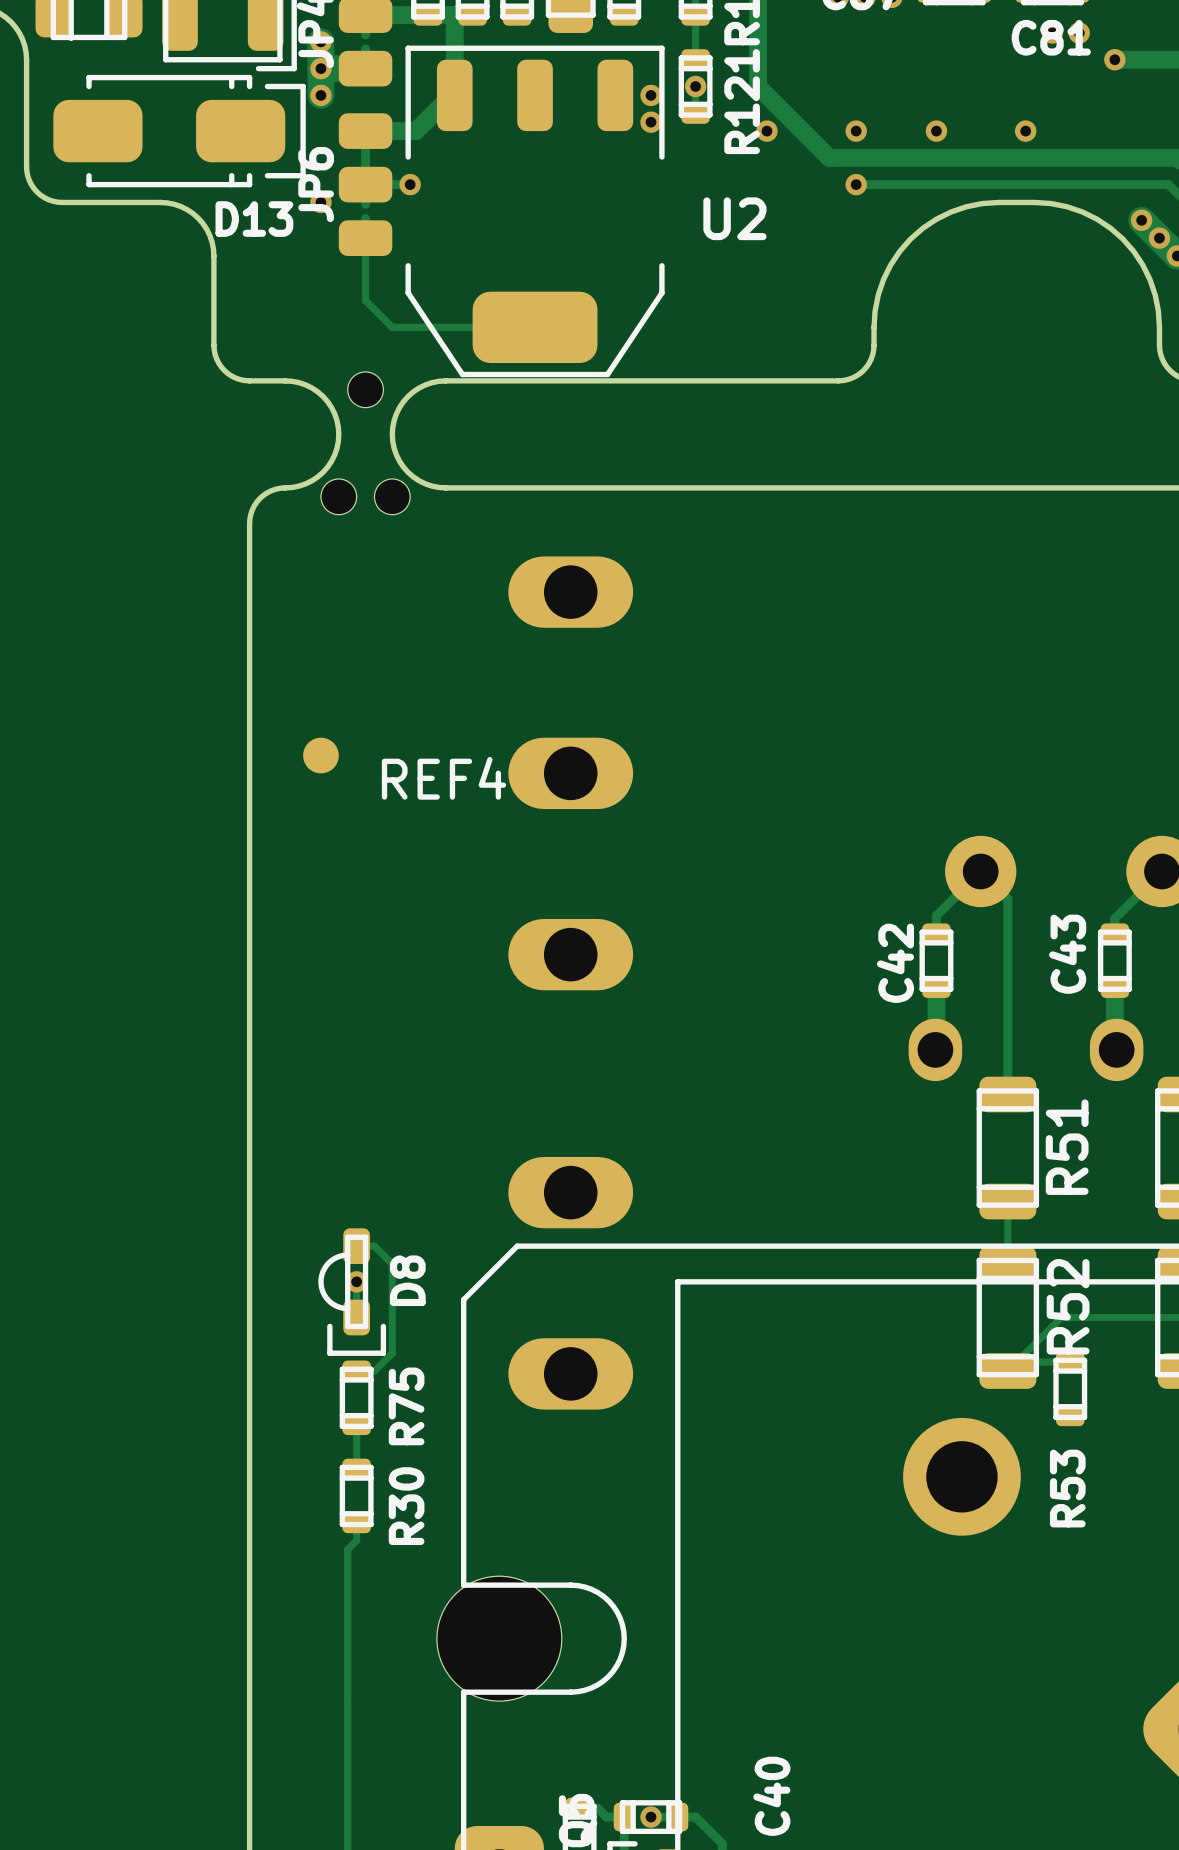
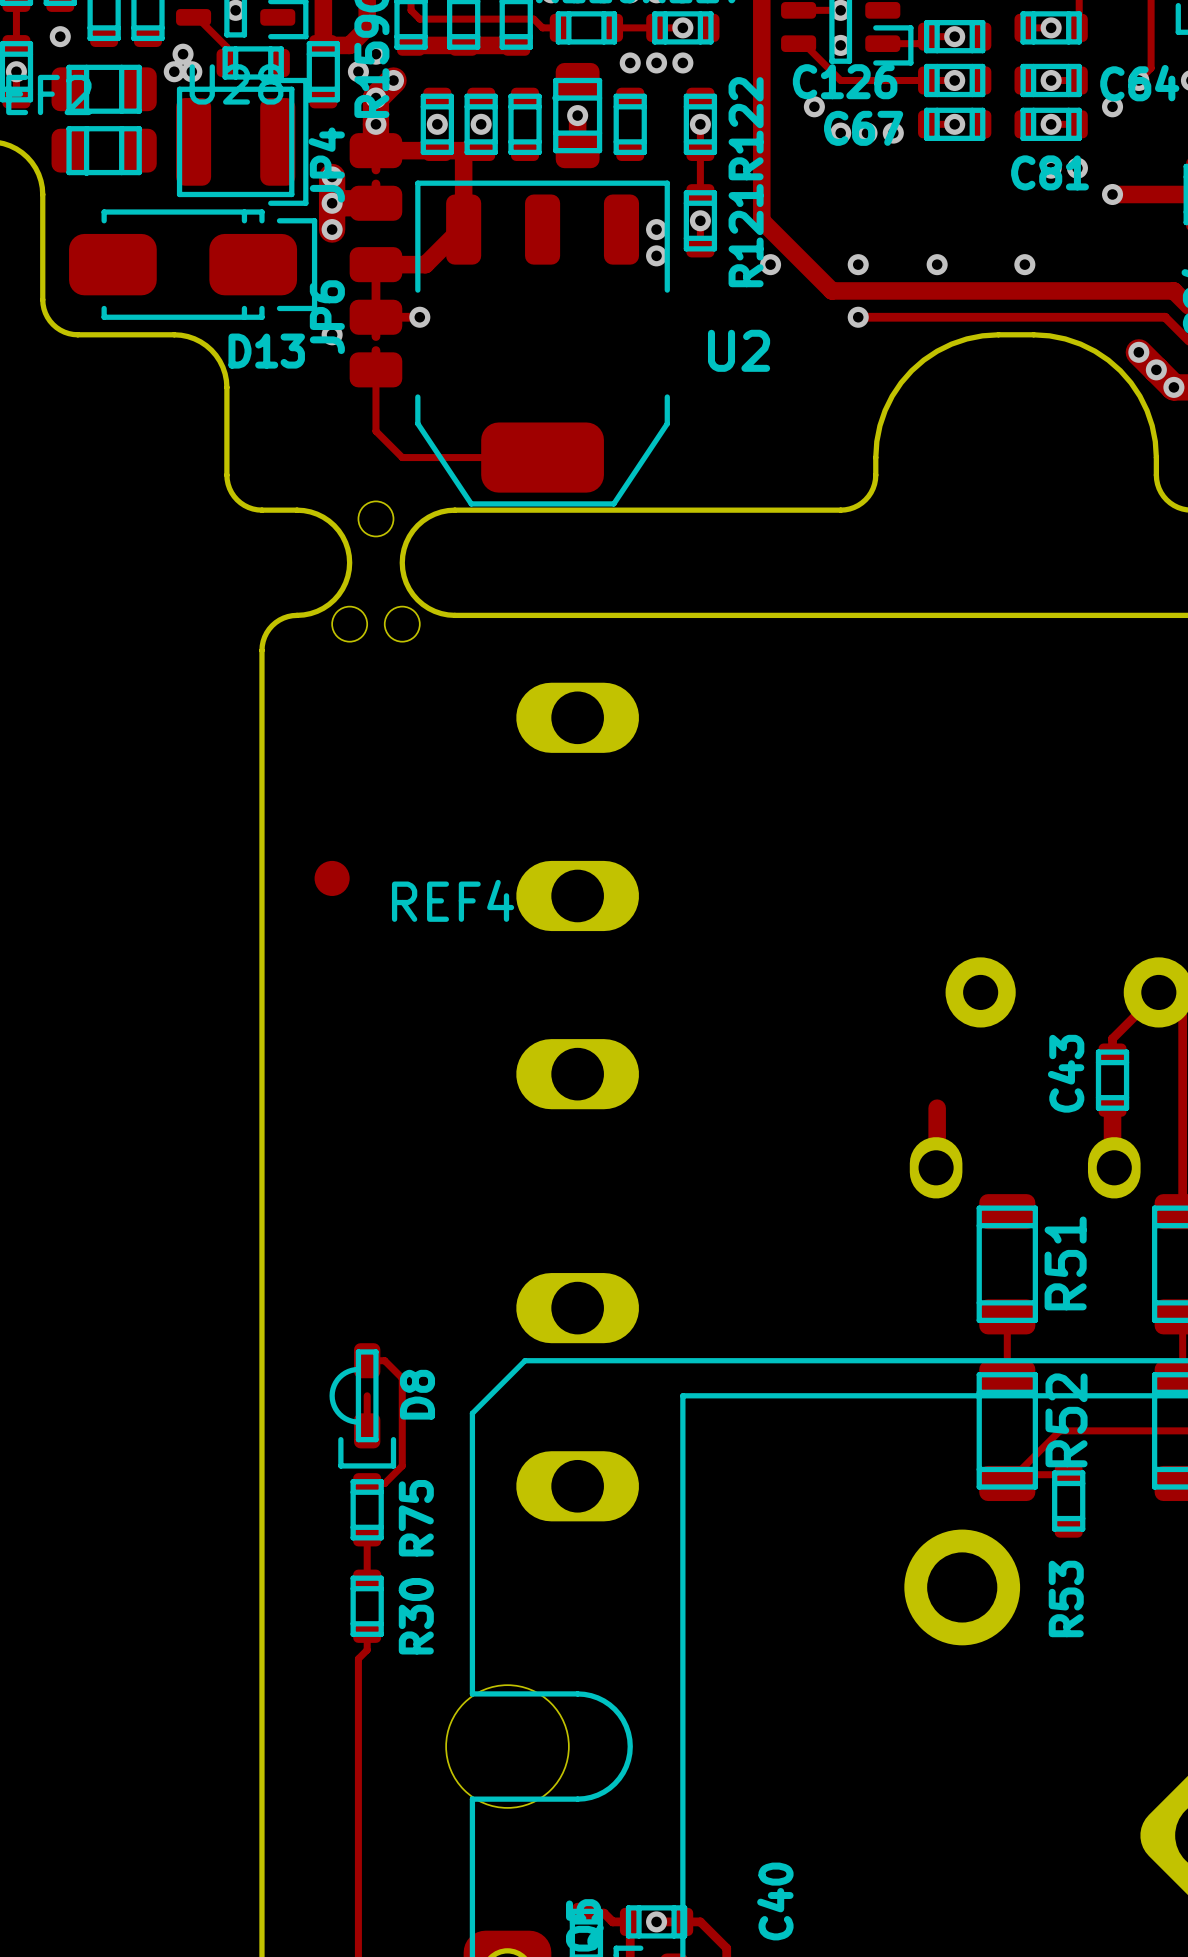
track: (936, 932) (936, 915) (980, 871) (1007, 898) (1007, 1090) -> none
C42: (936, 960) -> none
via: (356, 1281) -> none

